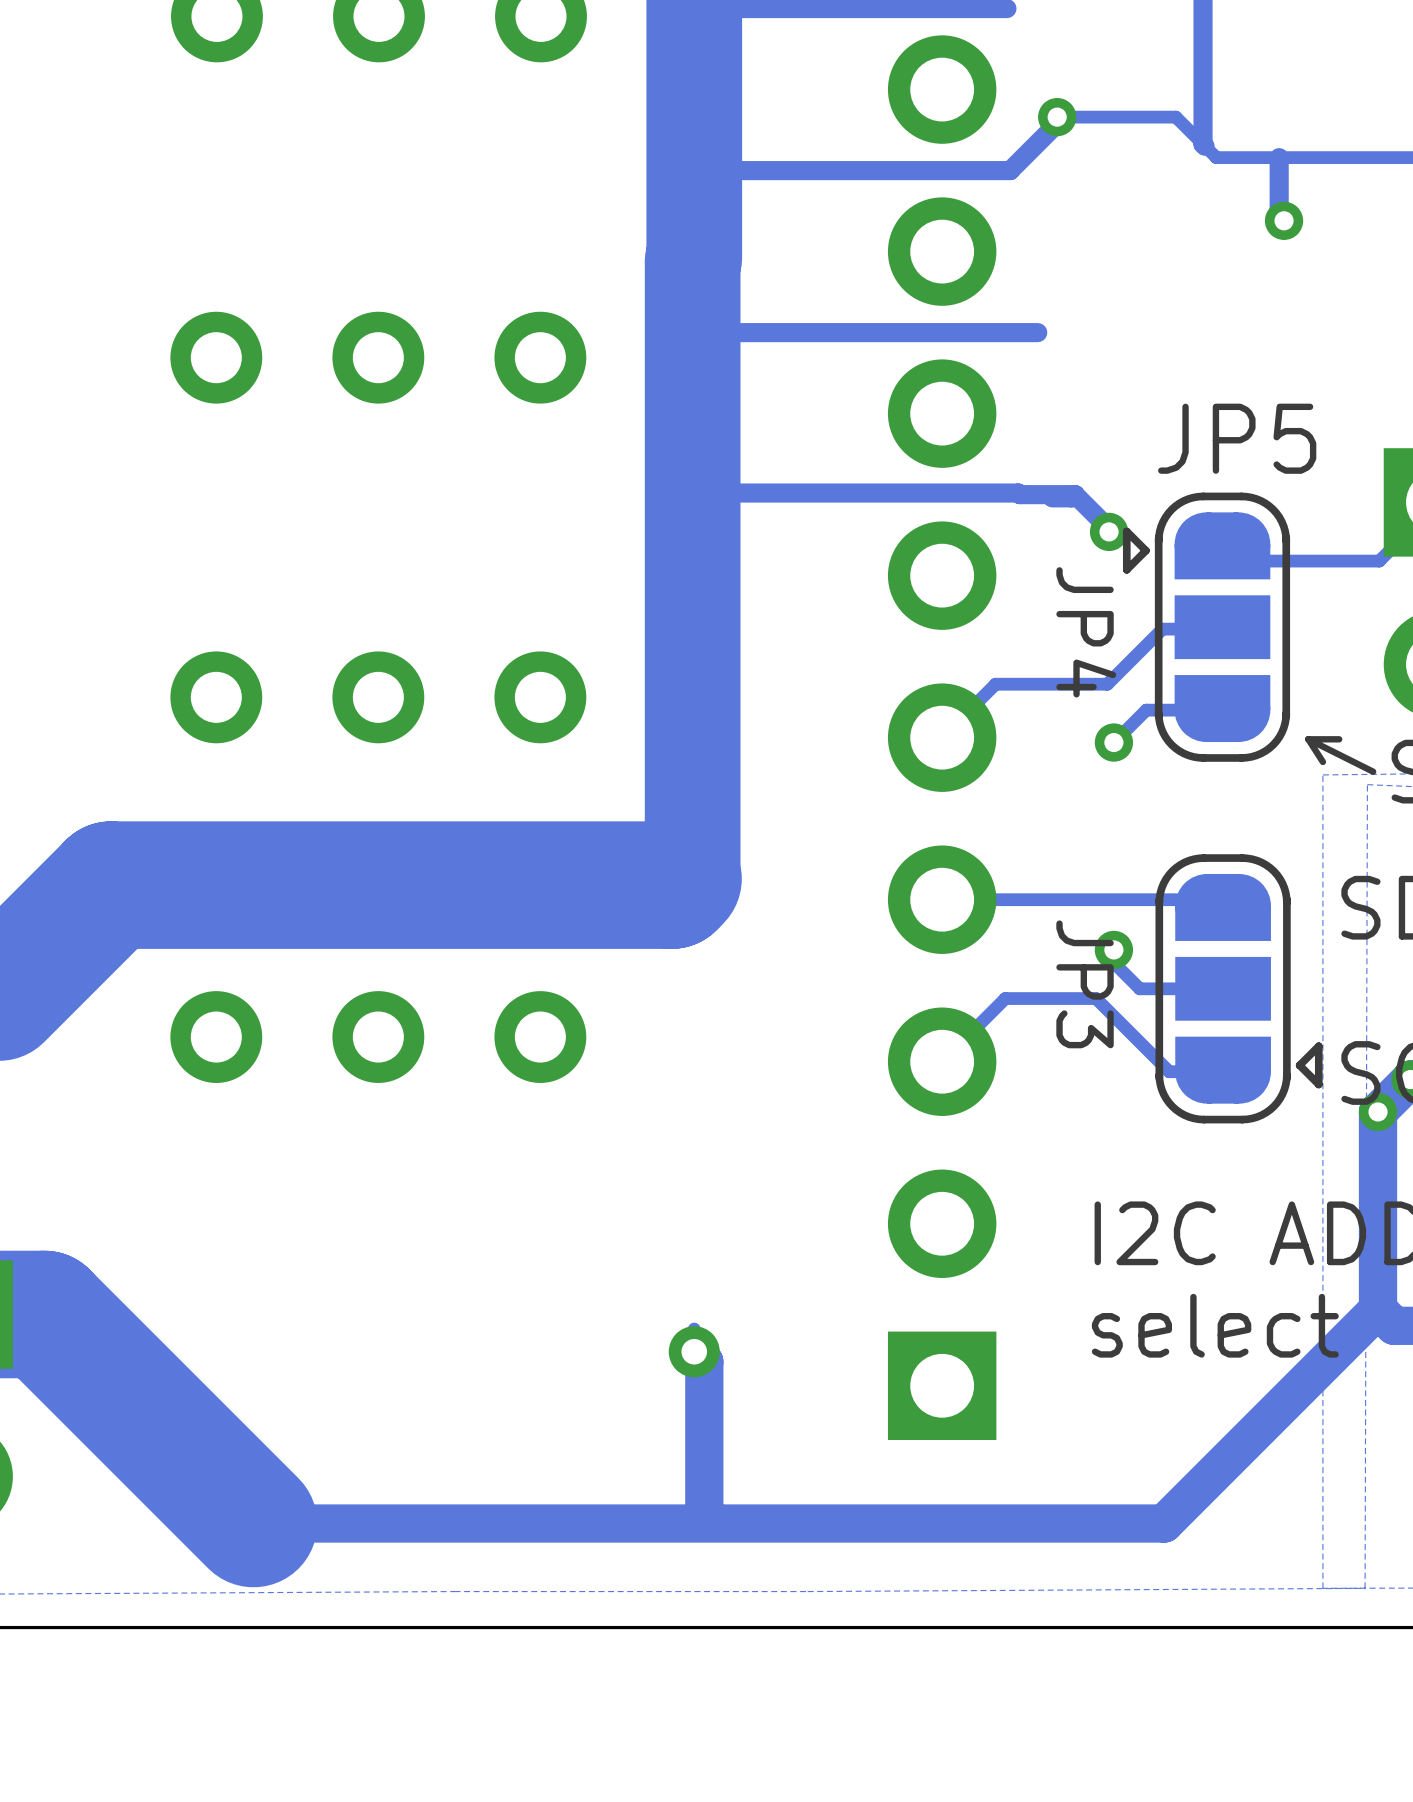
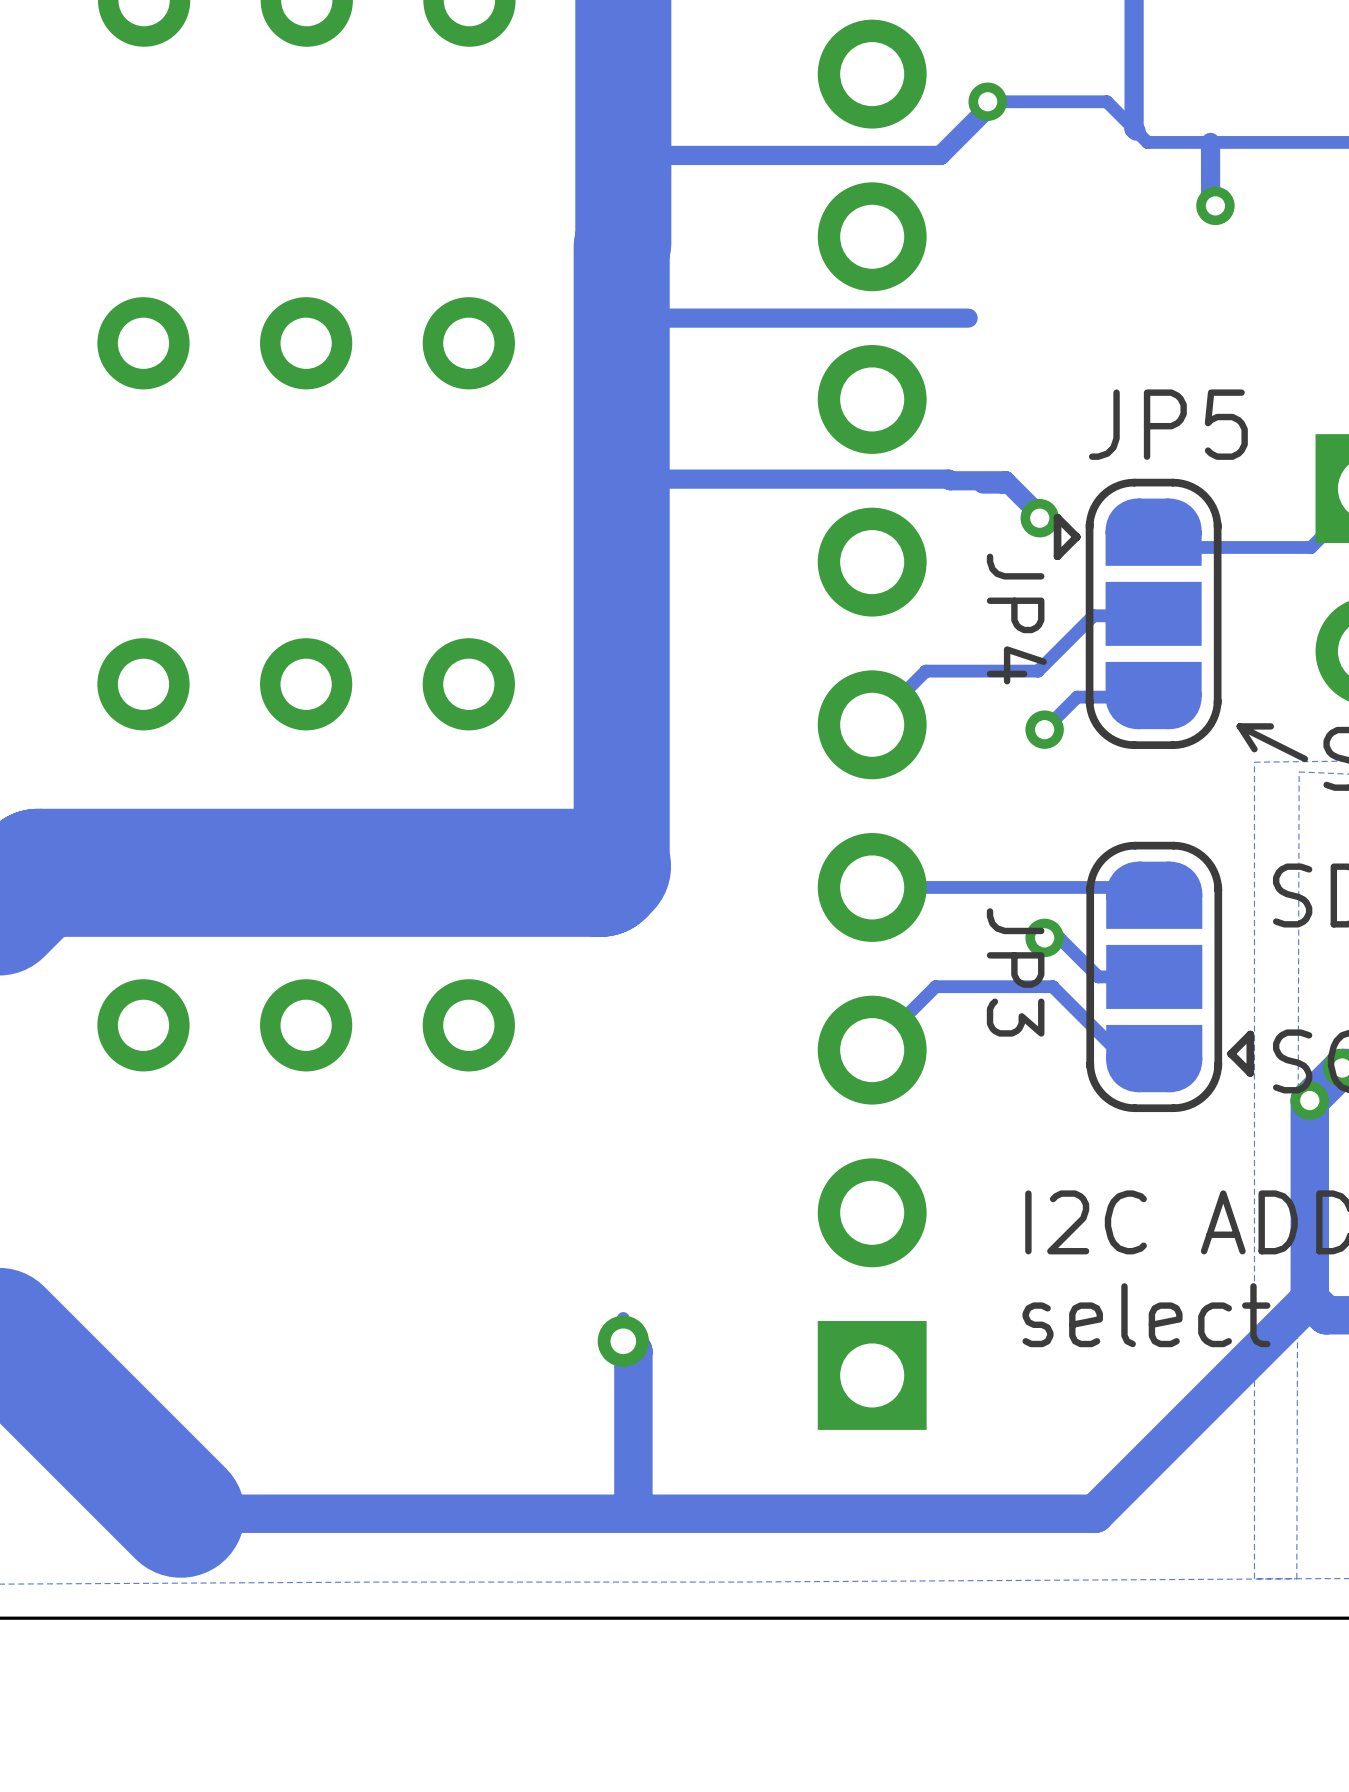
track: (1113, 949) (1113, 962) (1139, 988) (1167, 988) -> (1044, 937) (1059, 937) (1098, 976)
track: (1096, 998) (1169, 1071) (1195, 1071) -> (1026, 986) (1052, 986) (1126, 1060)

